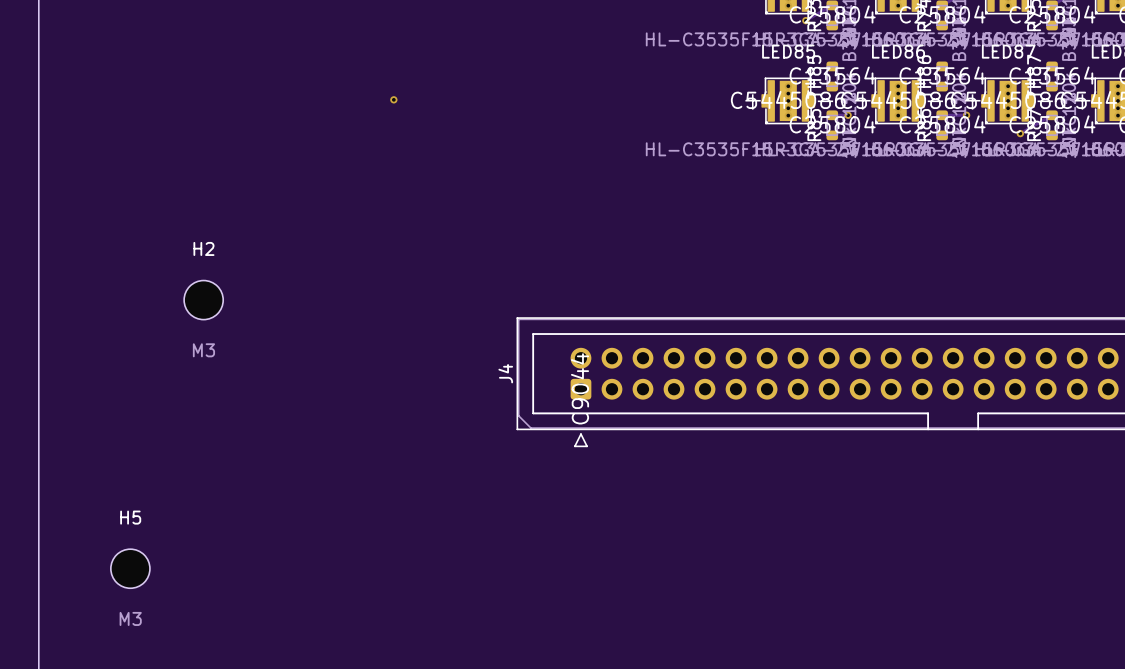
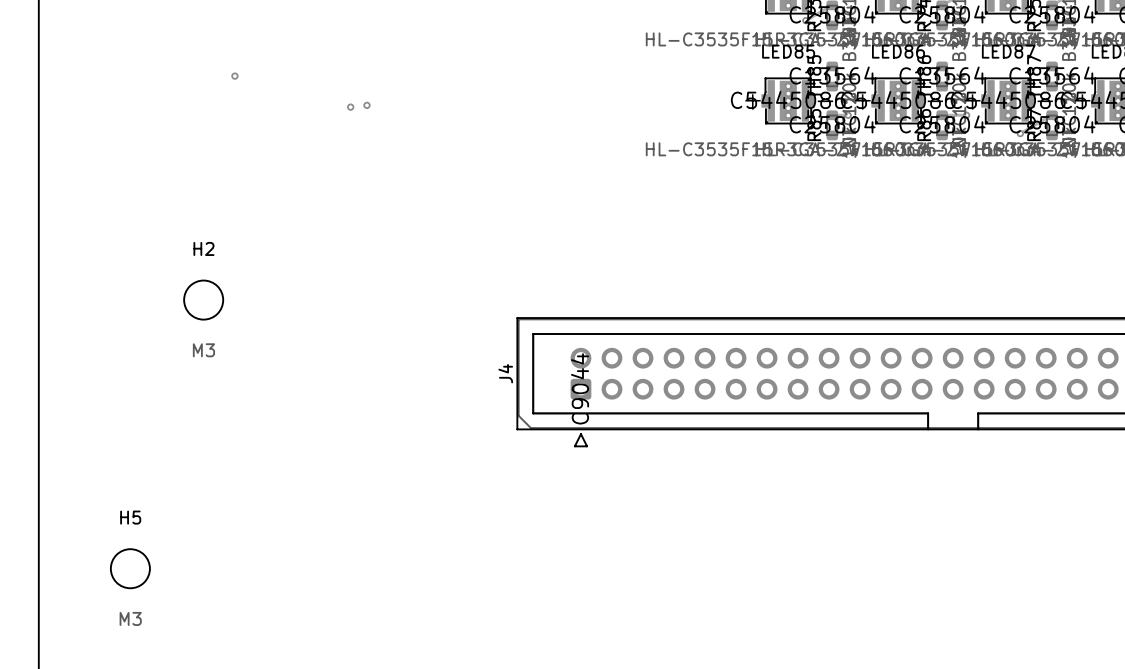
via: none -> (234, 76)
via: (393, 99) -> none
via: none -> (366, 105)
via: none -> (350, 107)

